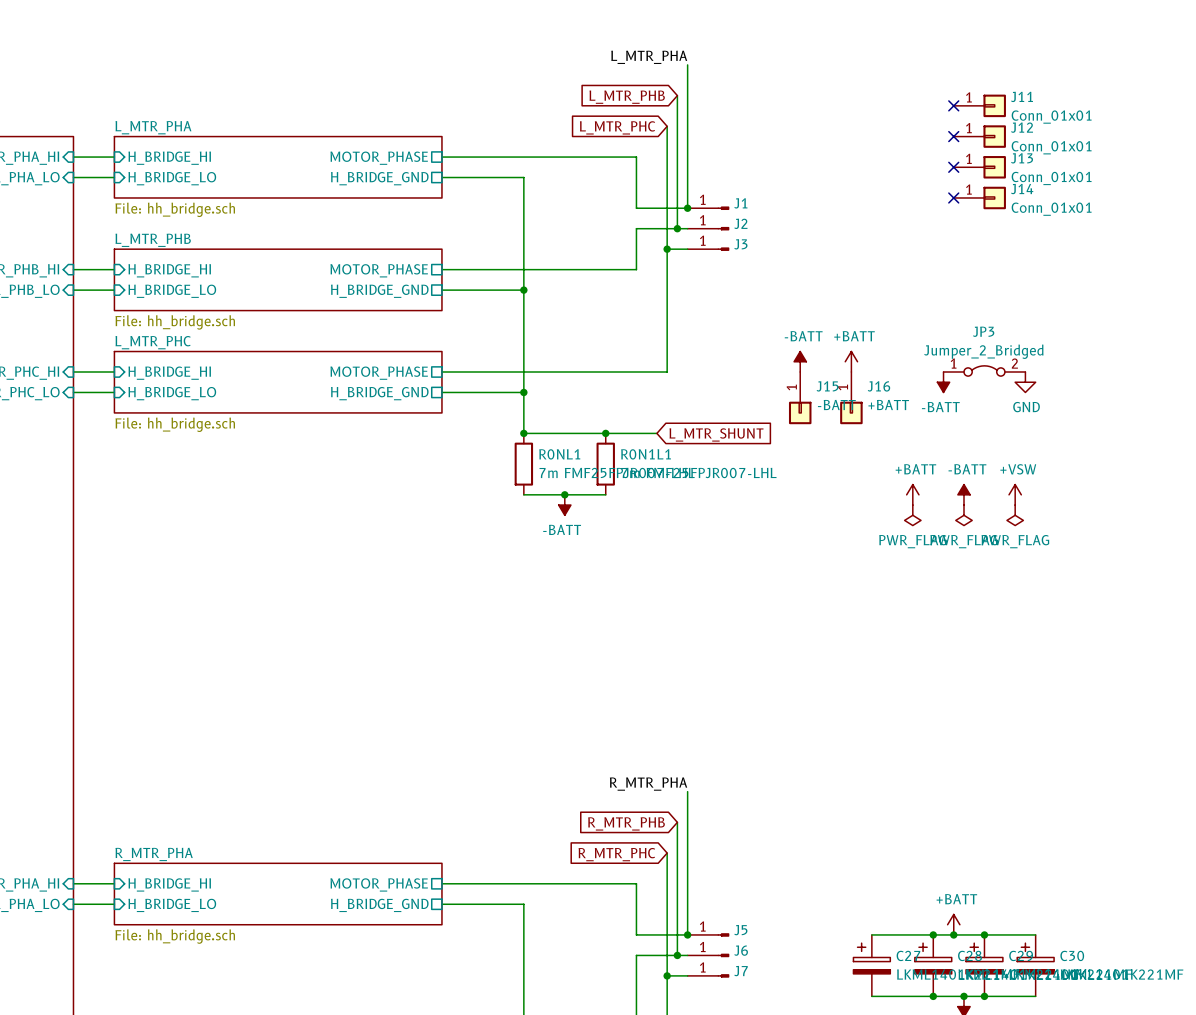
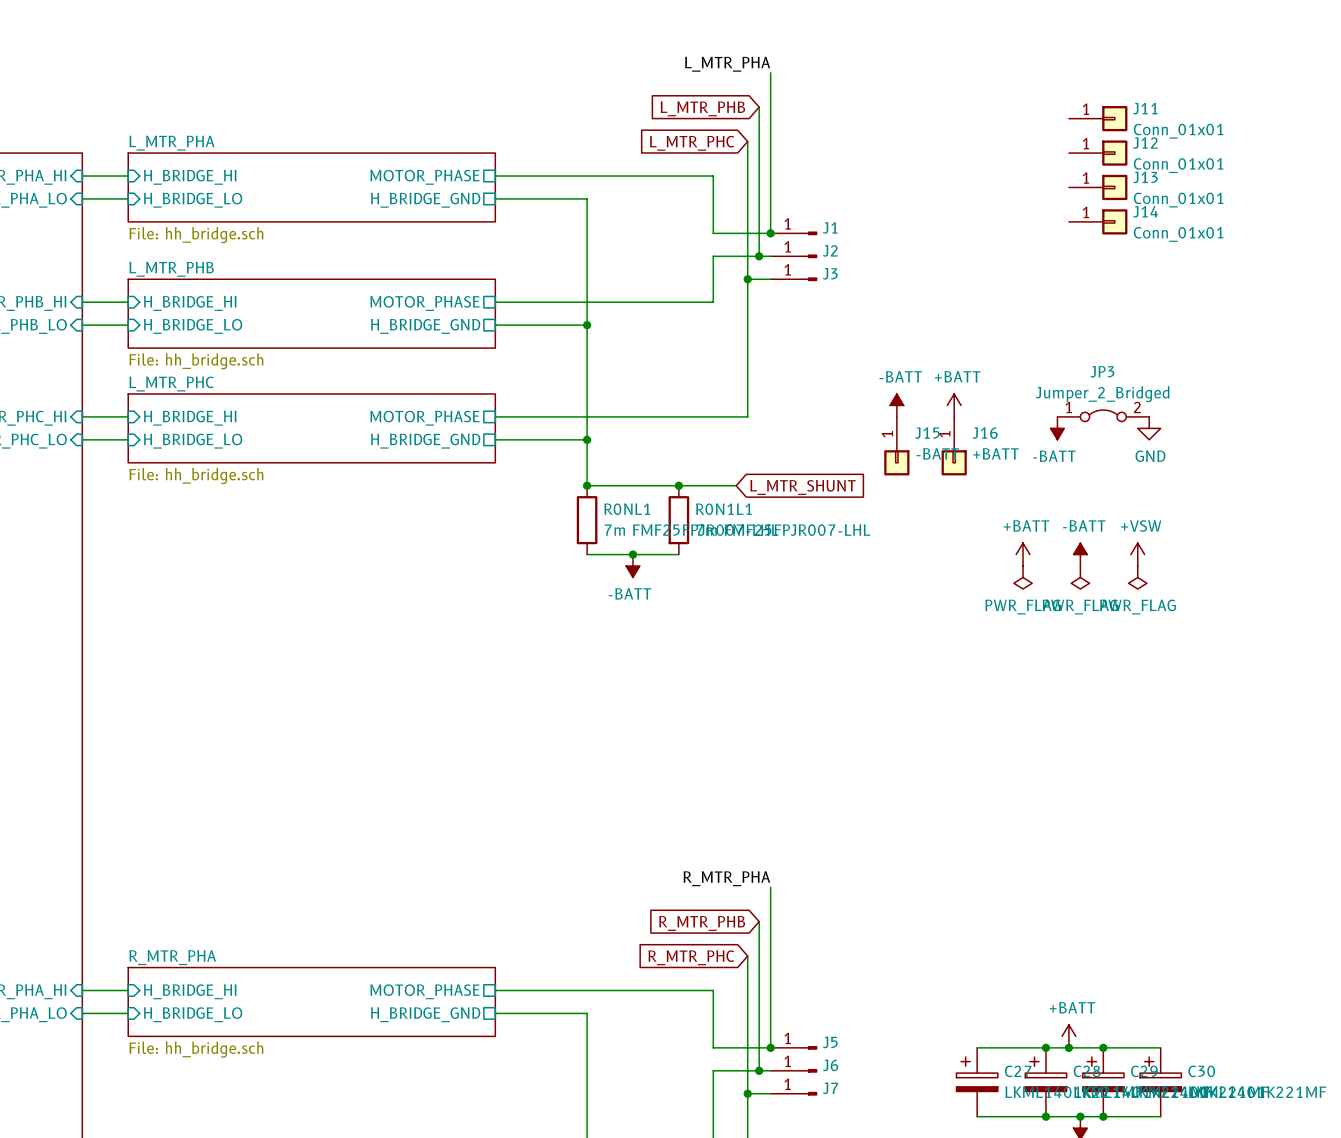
no-connect mark: (953, 105) -> none
no-connect mark: (953, 136) -> none
no-connect mark: (953, 167) -> none
no-connect mark: (953, 197) -> none

